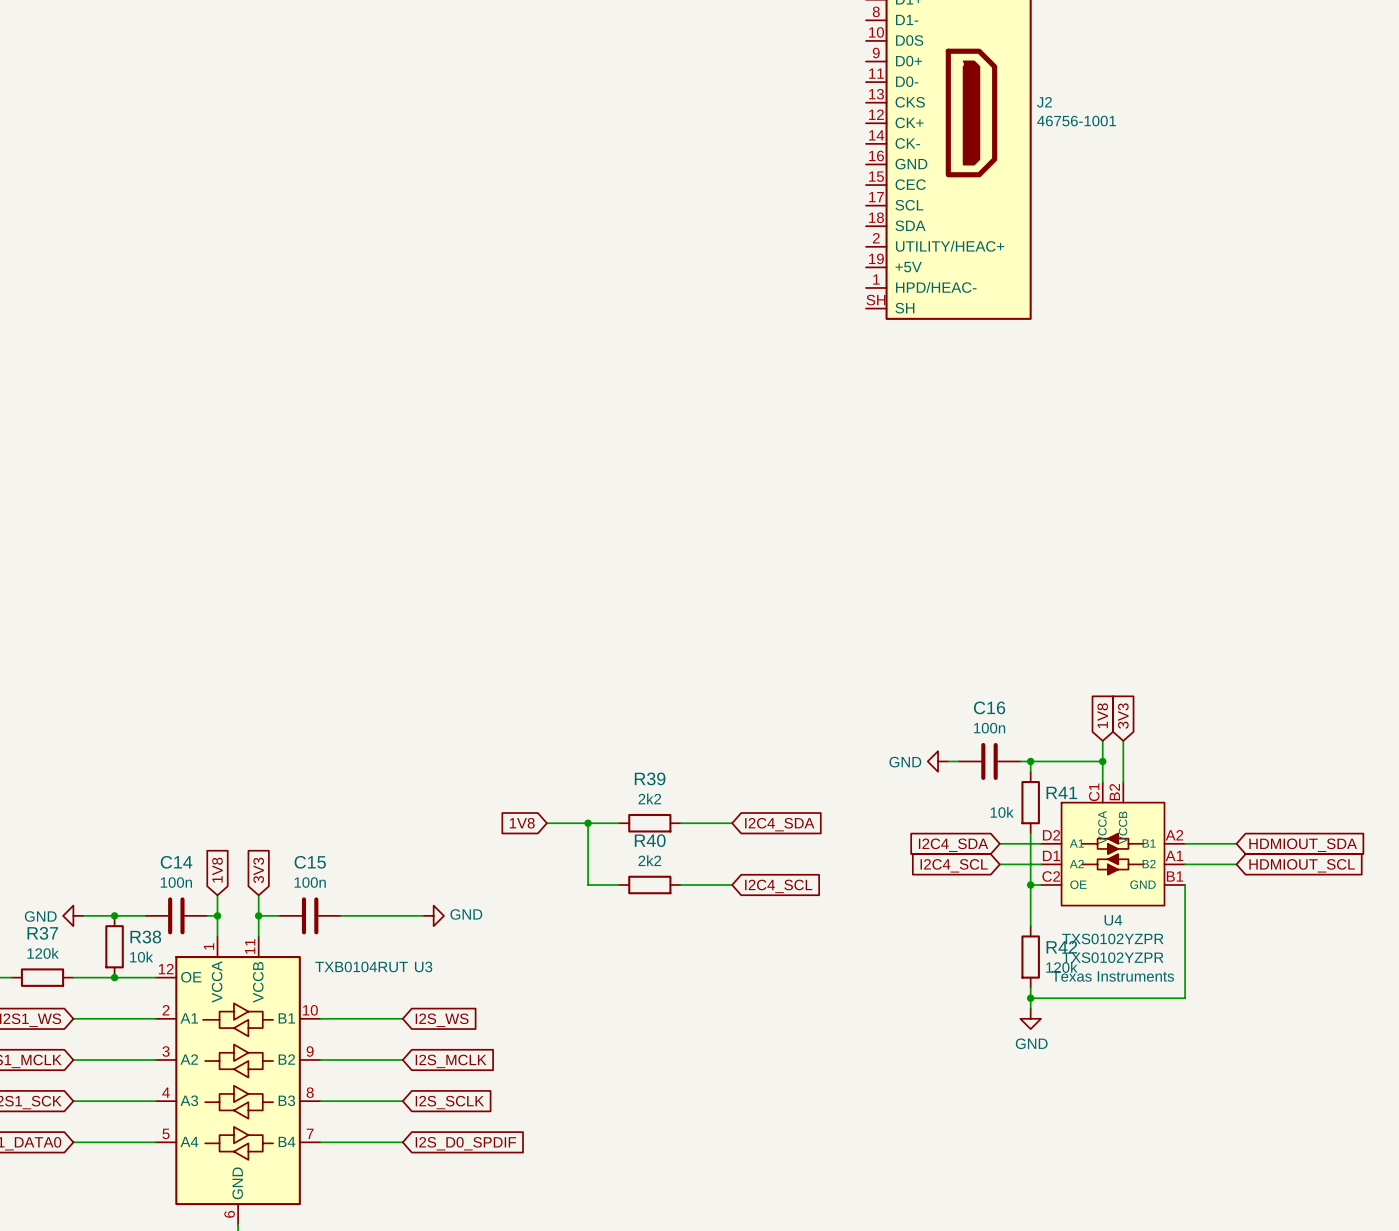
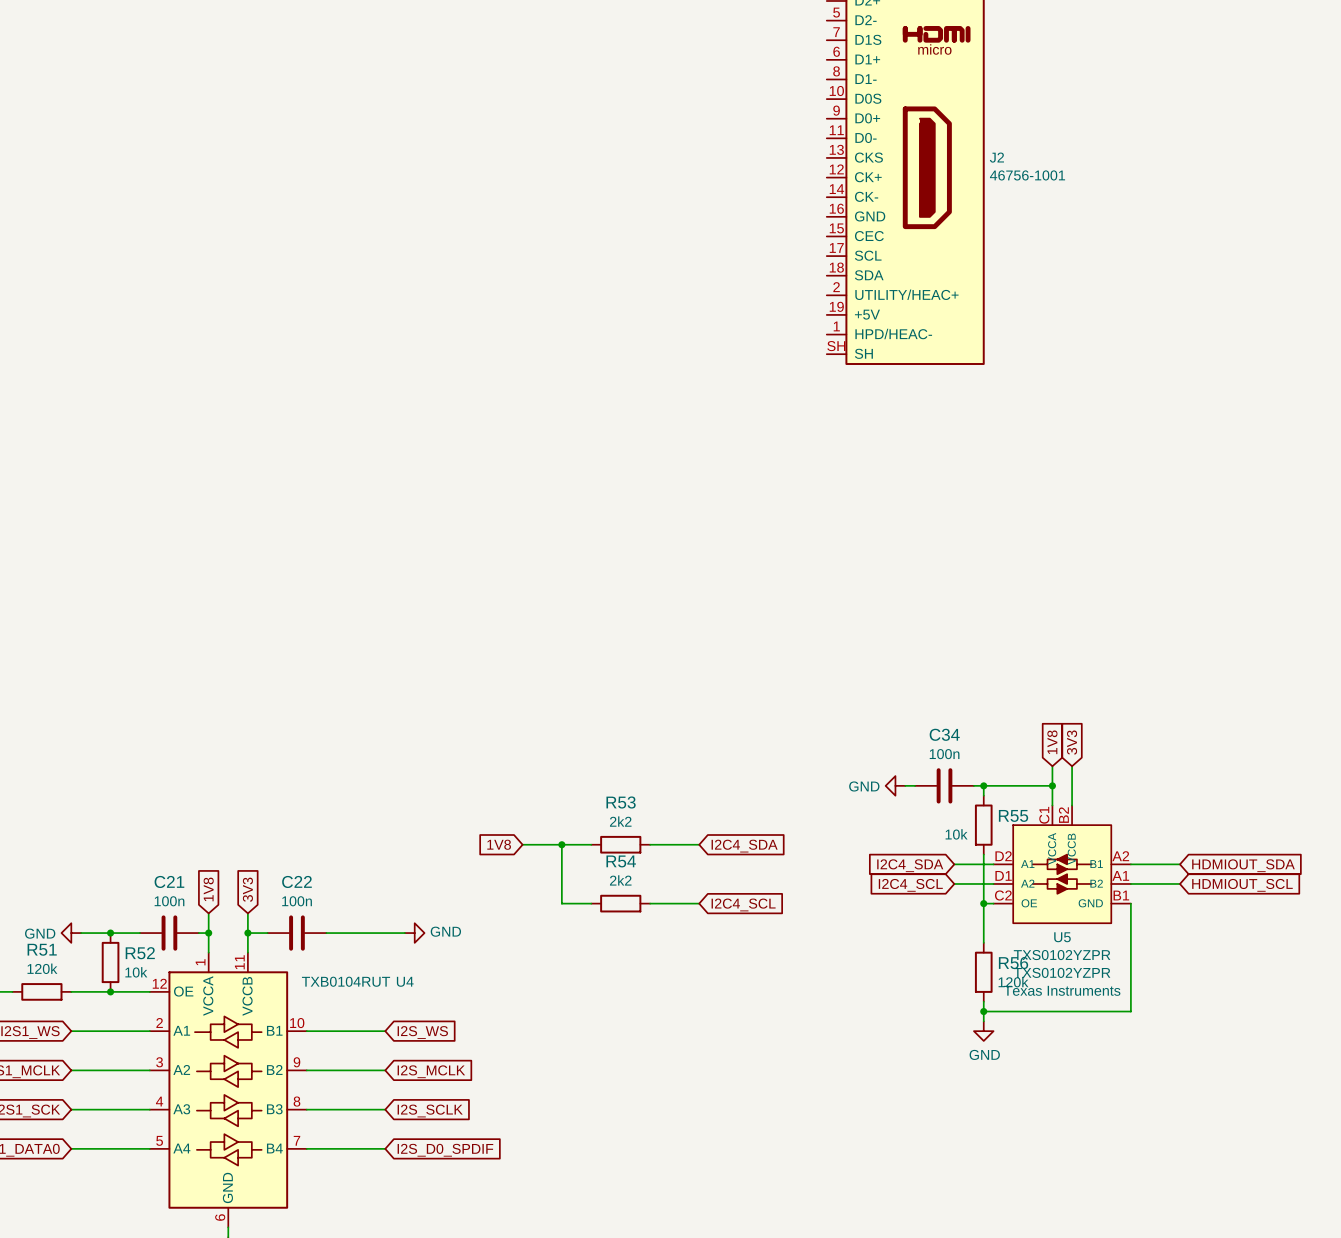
C16 name: C16 (989, 707) -> C34 (944, 734)
R39 name: R39 (650, 778) -> R53 (621, 802)
R41 name: R41 (1061, 792) -> R55 (1013, 815)
R40 name: R40 (650, 840) -> R54 (621, 861)
C14 name: C14 (176, 862) -> C21 (169, 881)
C15 name: C15 (310, 862) -> C22 (296, 881)
U4 name: U4 (1113, 920) -> U5 (1062, 937)
R37 name: R37 (42, 933) -> R51 (42, 949)
R38 name: R38 (145, 937) -> R52 (140, 953)
R42 name: R42 (1061, 947) -> R56 (1013, 963)
U3 name: U3 (423, 966) -> U4 (405, 981)

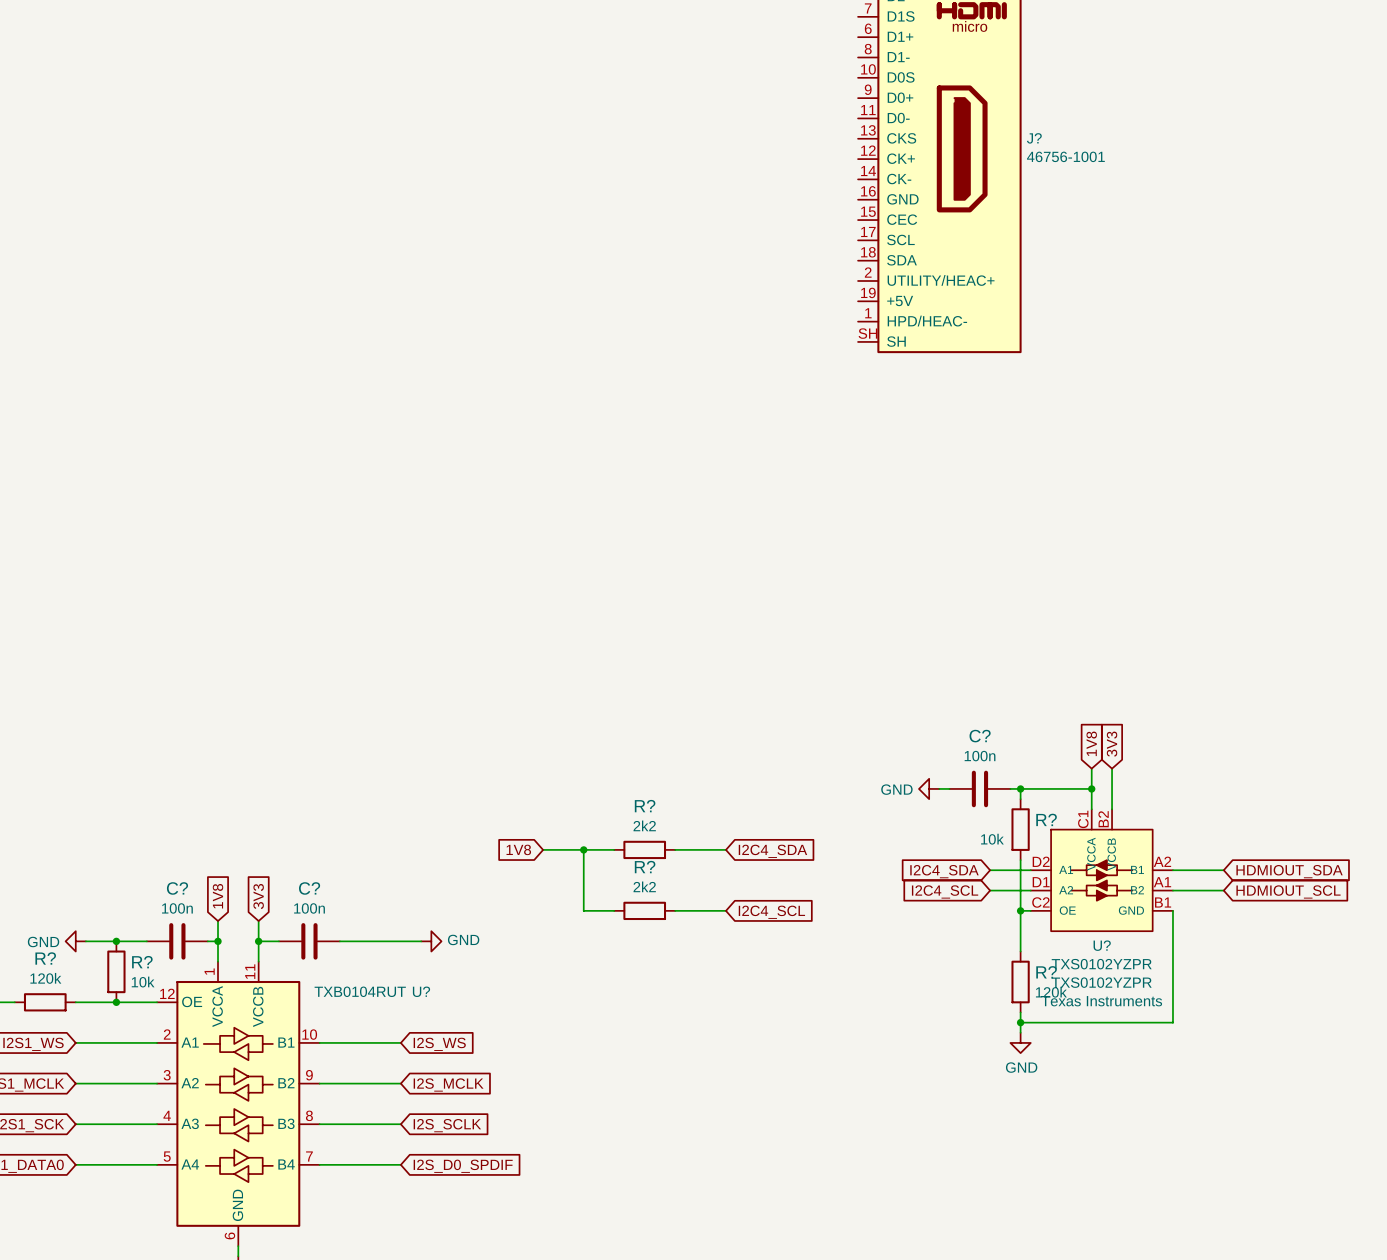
J2 name: J2 (996, 157) -> J? (1034, 138)
C34 name: C34 (944, 734) -> C? (980, 736)
R53 name: R53 (621, 802) -> R? (645, 806)
R55 name: R55 (1013, 815) -> R? (1046, 819)
R54 name: R54 (621, 861) -> R? (645, 867)
C21 name: C21 (169, 881) -> C? (177, 888)
C22 name: C22 (296, 881) -> C? (309, 888)
U5 name: U5 (1062, 937) -> U? (1102, 945)
R51 name: R51 (42, 949) -> R? (45, 958)
R52 name: R52 (140, 953) -> R? (142, 962)
R56 name: R56 (1013, 963) -> R? (1046, 972)
U4 name: U4 (405, 981) -> U? (421, 991)

